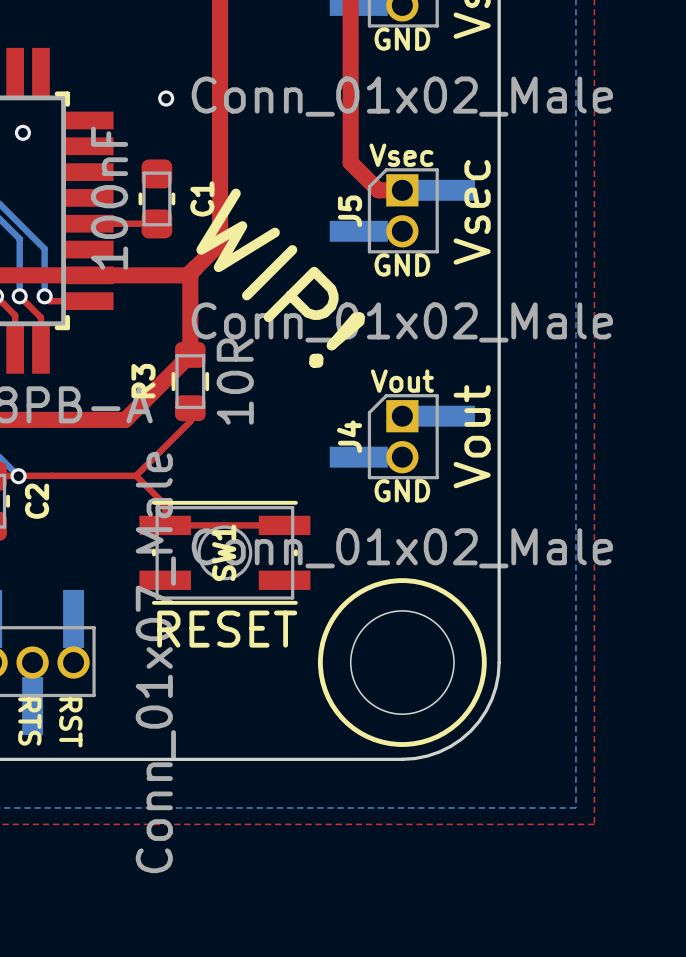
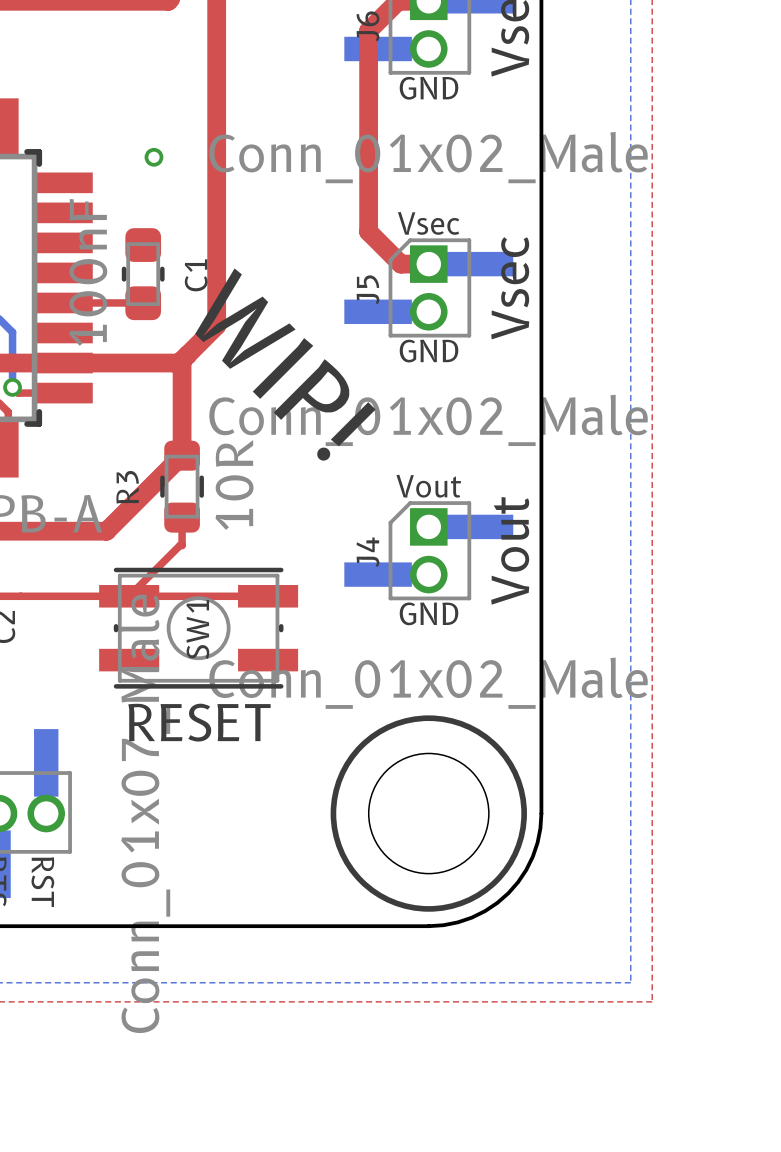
top track: (190, 421) (136, 475) (165, 504) (165, 525) (284, 525) -> (182, 533) (182, 545) (129, 596)
top track: none -> (118, 596) (268, 596)
SW1 position: (224, 552) -> (198, 628)
text position: RESET (227, 629) -> RESET (199, 722)

